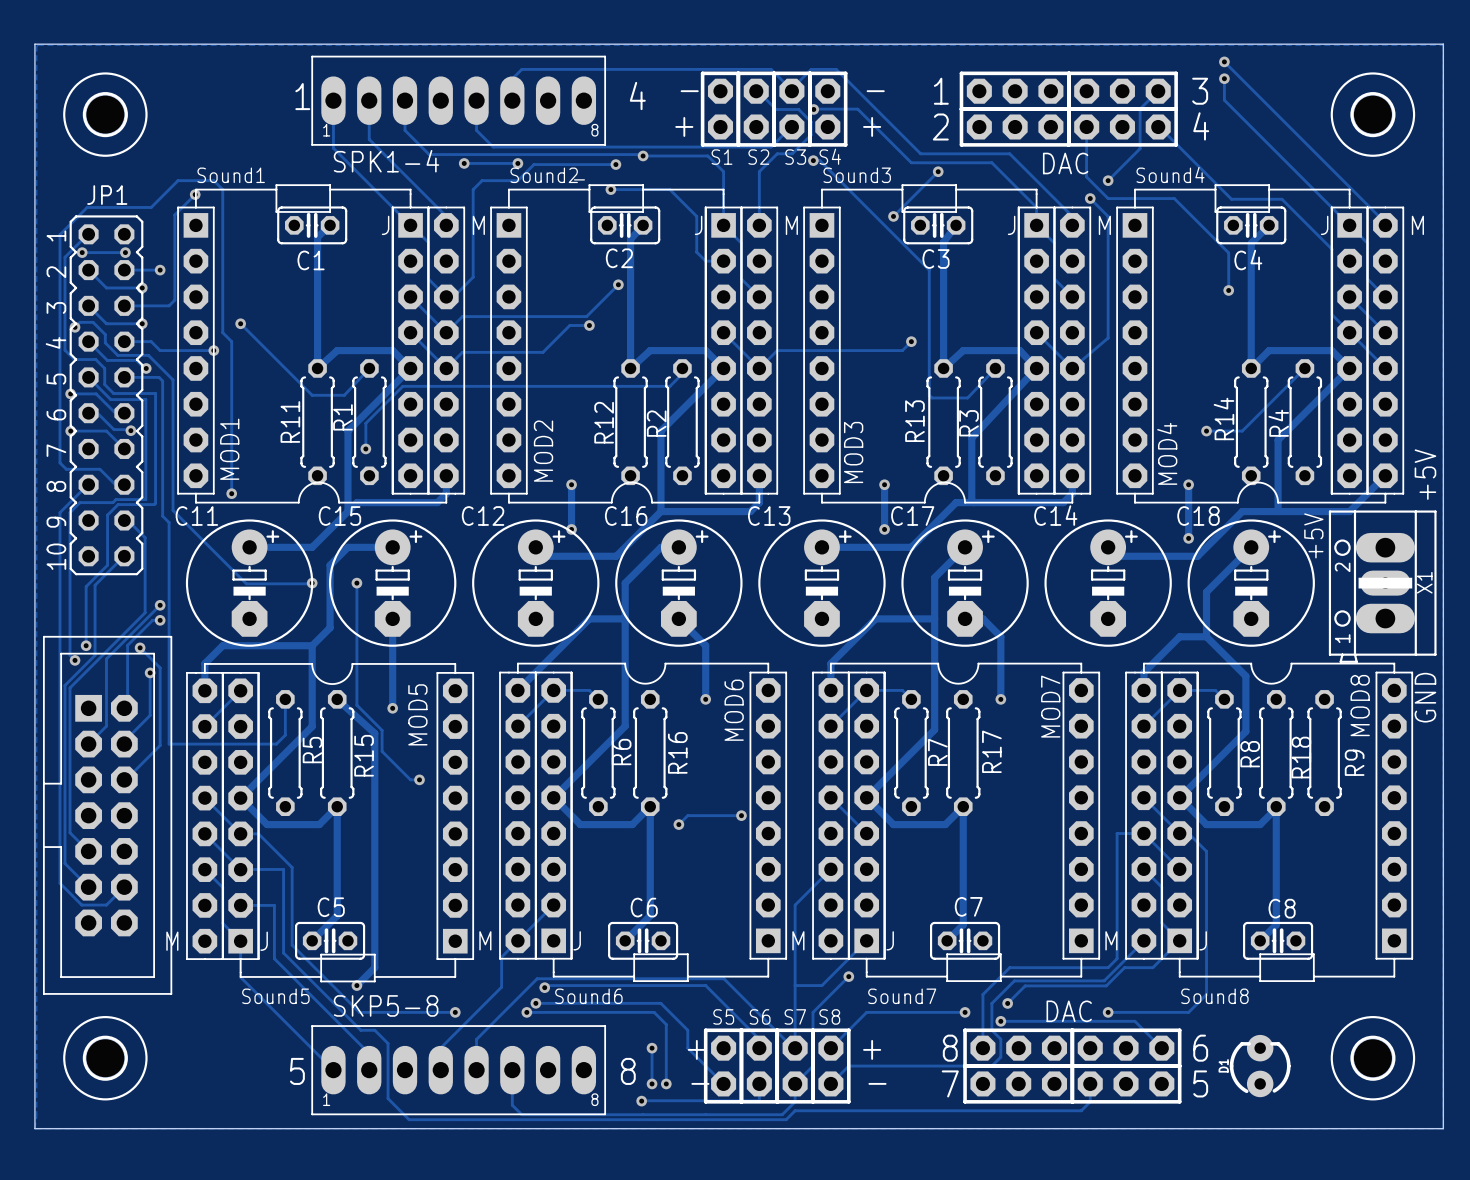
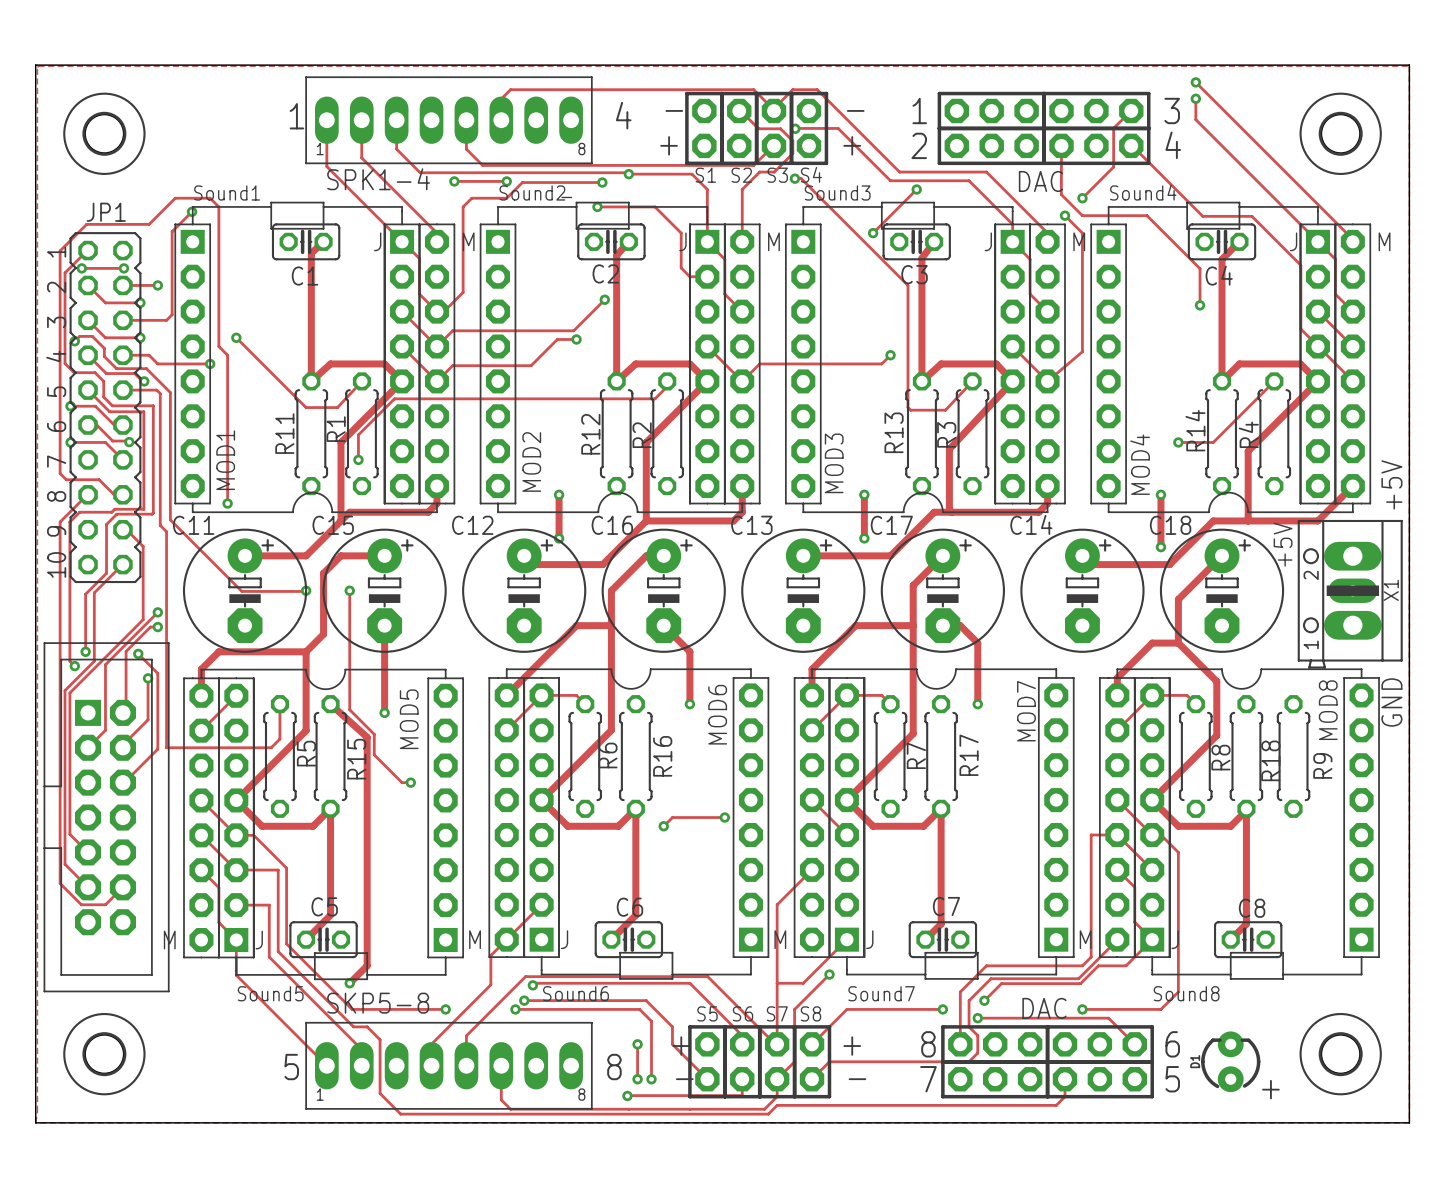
text: none -> + (1270, 1089)

